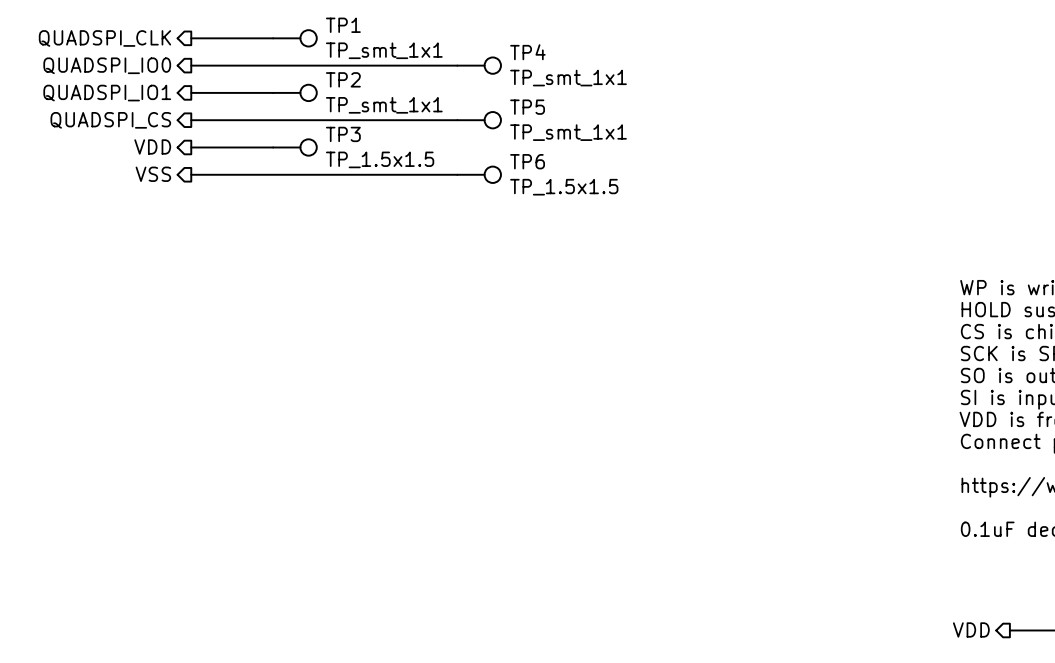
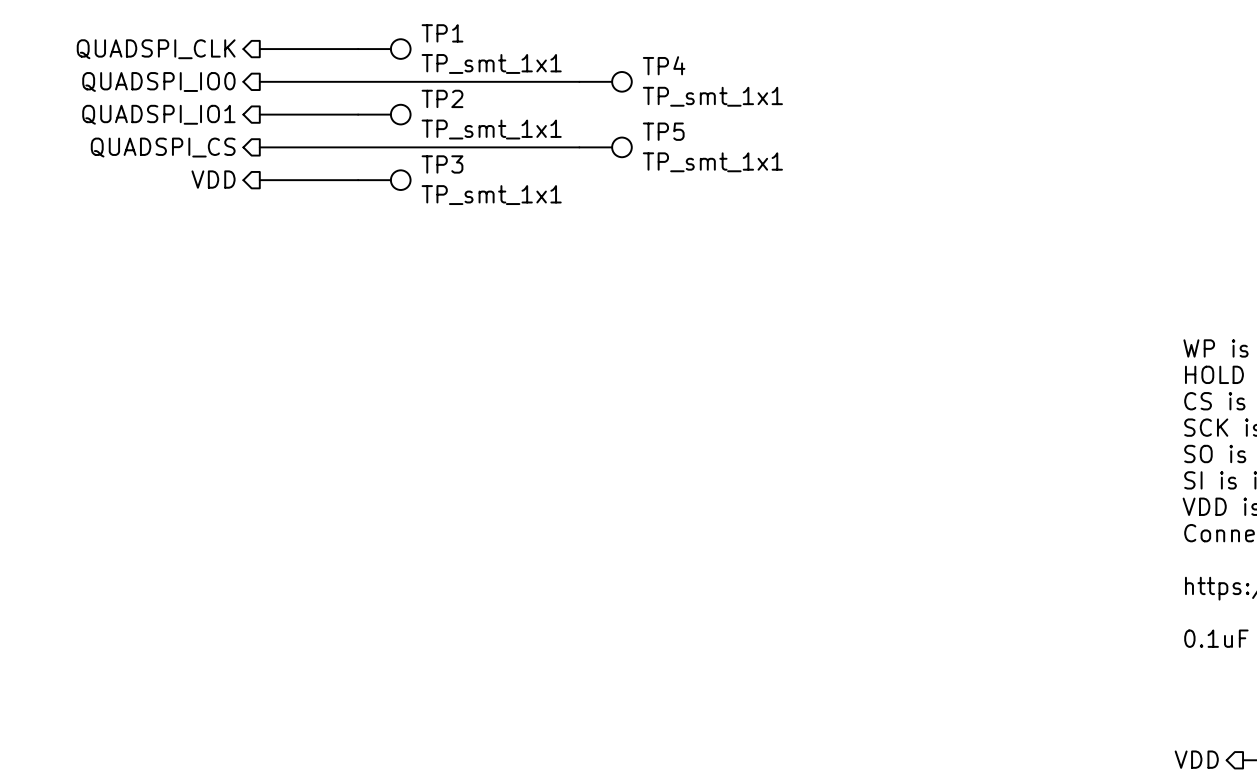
TP3 value: TP_1.5x1.5 (380, 159) -> TP_smt_1x1 (491, 195)
hierarchical label: VSS (153, 174) -> none
wire: (191, 174) (457, 174) -> none
TP6: TP_1.5x1.5 (479, 174) -> none

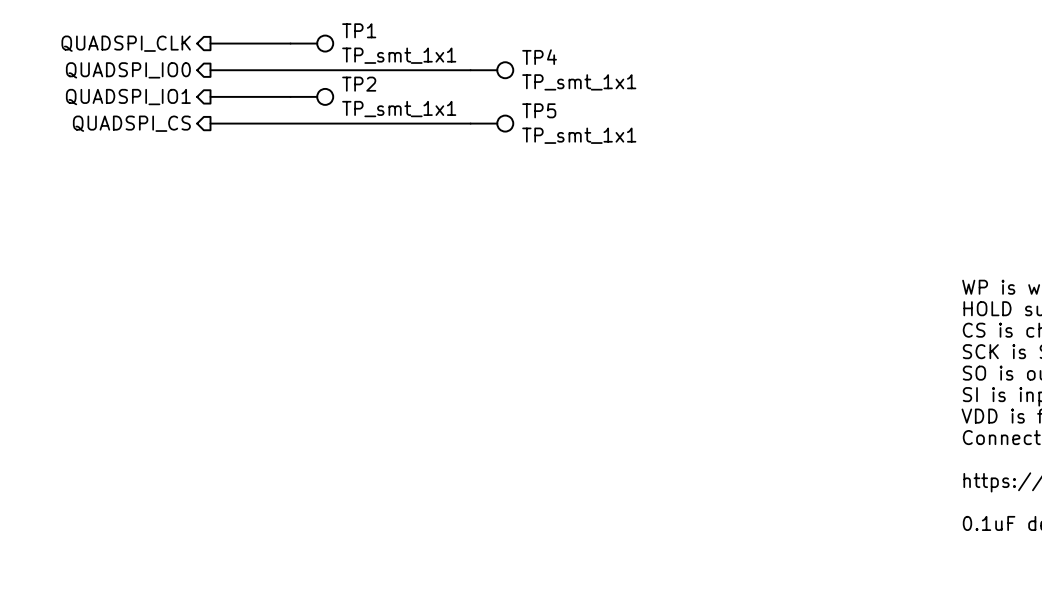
hierarchical label: VDD (213, 179) -> none
wire: (259, 180) (358, 180) -> none
TP3: TP_smt_1x1 (384, 180) -> none

